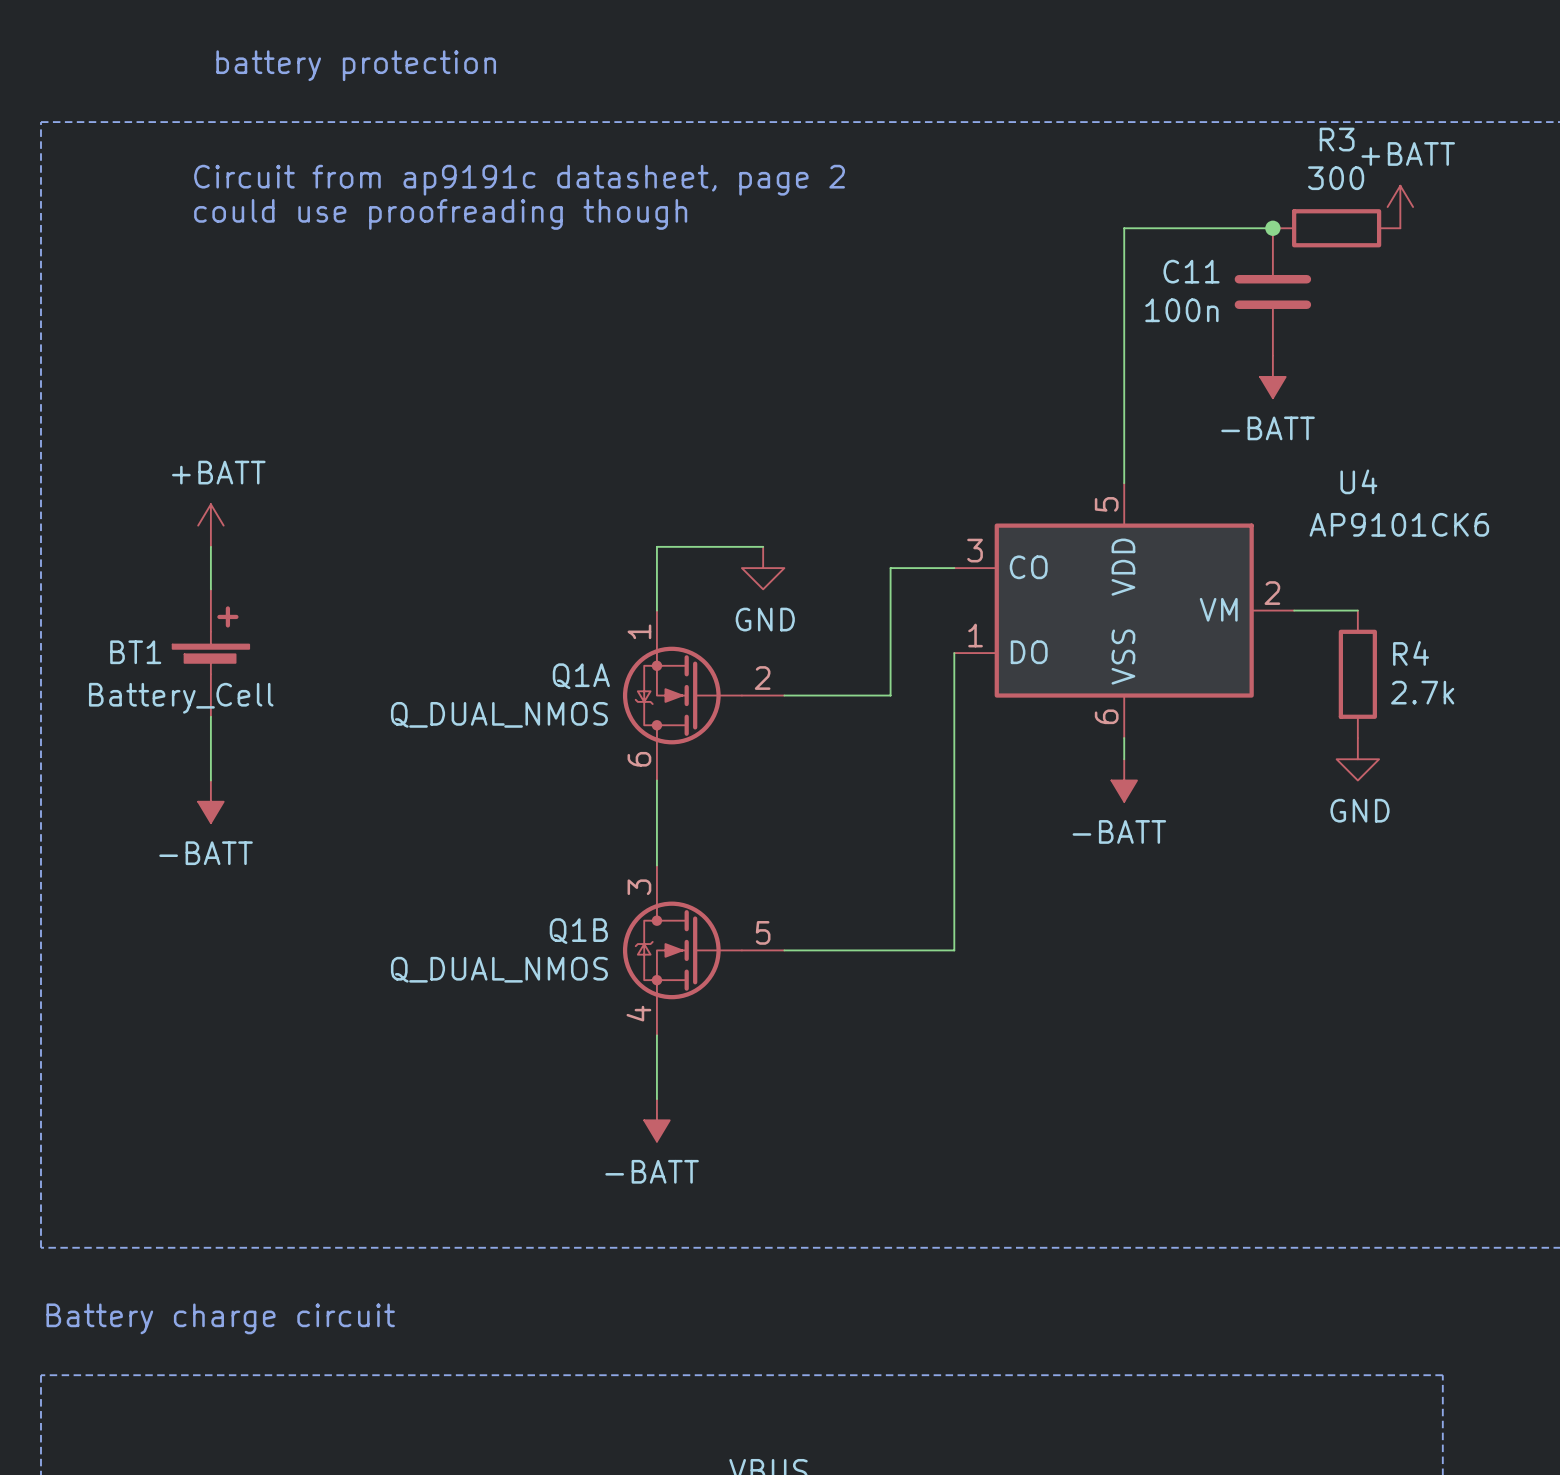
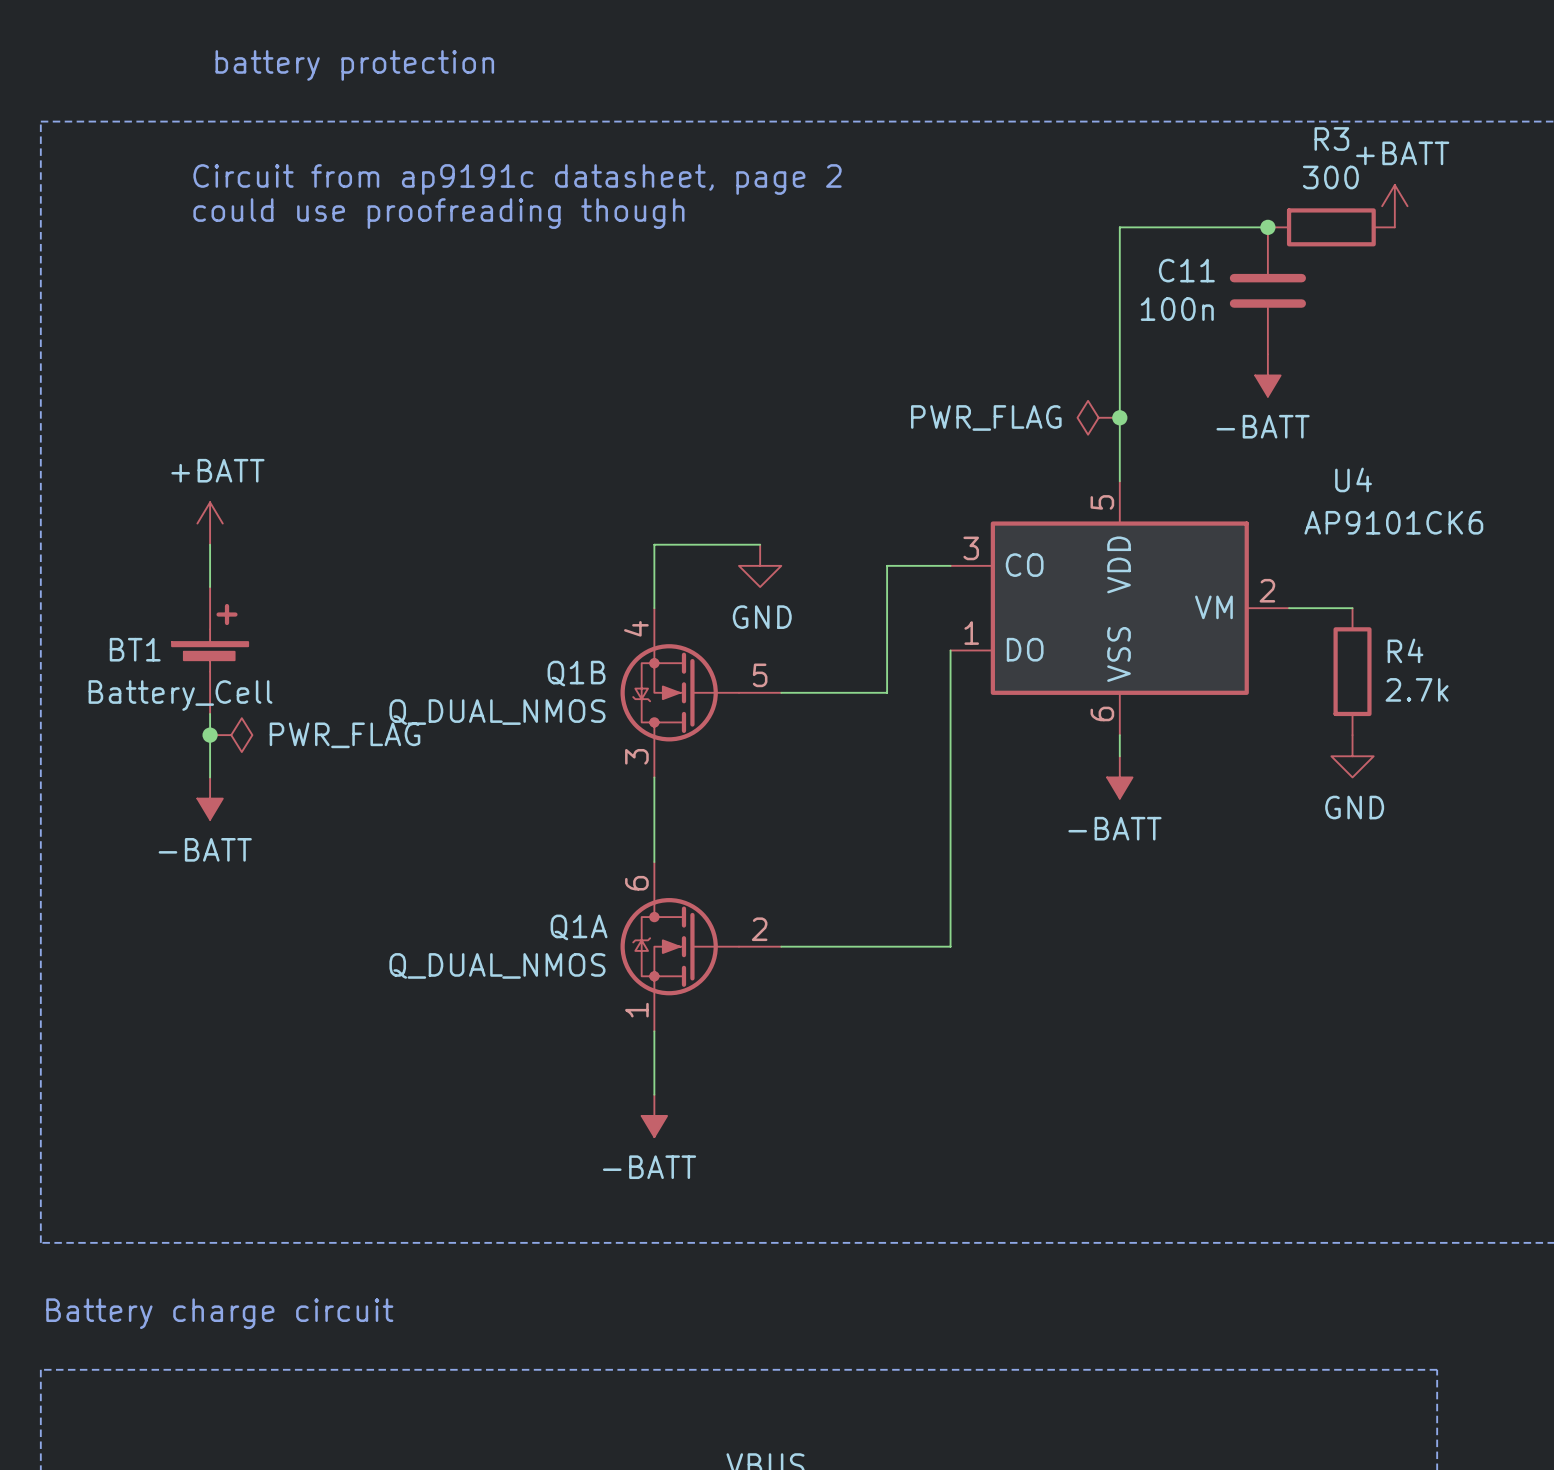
power symbol: none -> PWR_FLAG (1098, 417)
junction: none -> (1119, 417)
Q1A flip: as is (682, 695) -> up-down (679, 946)
Q1A position: (703, 695) -> (700, 946)
junction: none -> (210, 735)
power symbol: none -> PWR_FLAG (231, 735)
Q1B flip: as is (682, 950) -> up-down (679, 692)
Q1B position: (703, 950) -> (700, 692)

